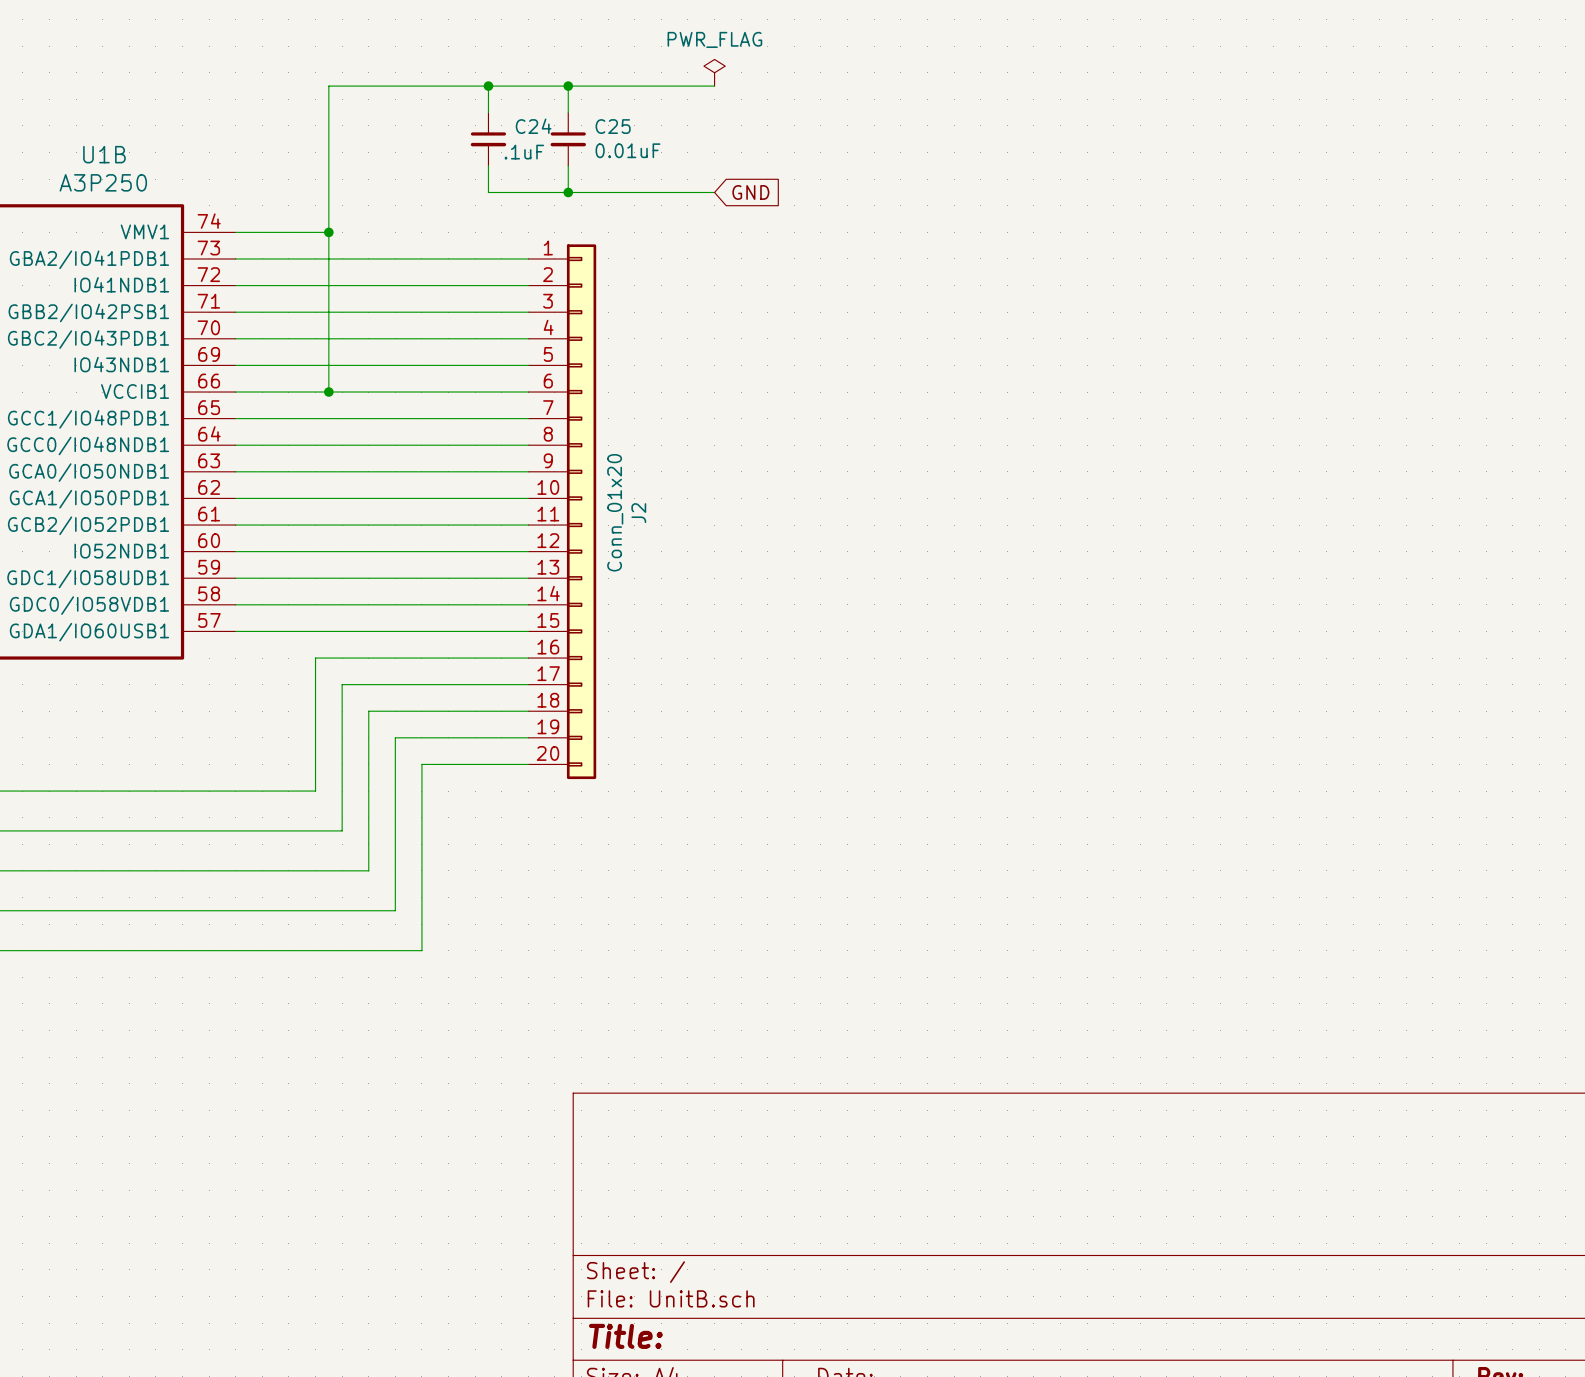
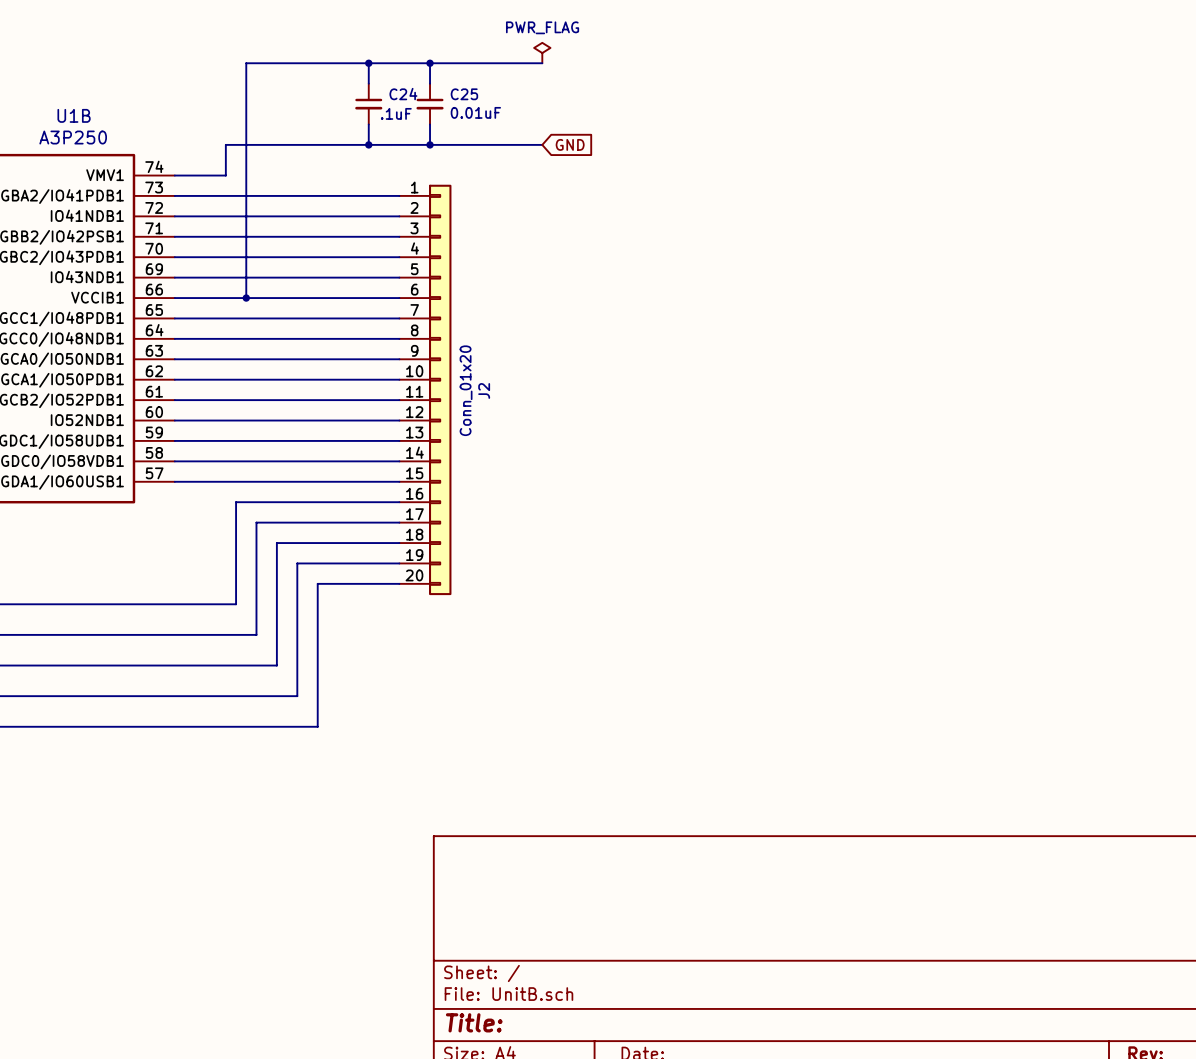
junction: none -> (368, 144)
wire: (302, 232) (328, 232) -> (225, 175) (225, 144) (368, 144)
junction: (328, 232) -> none

